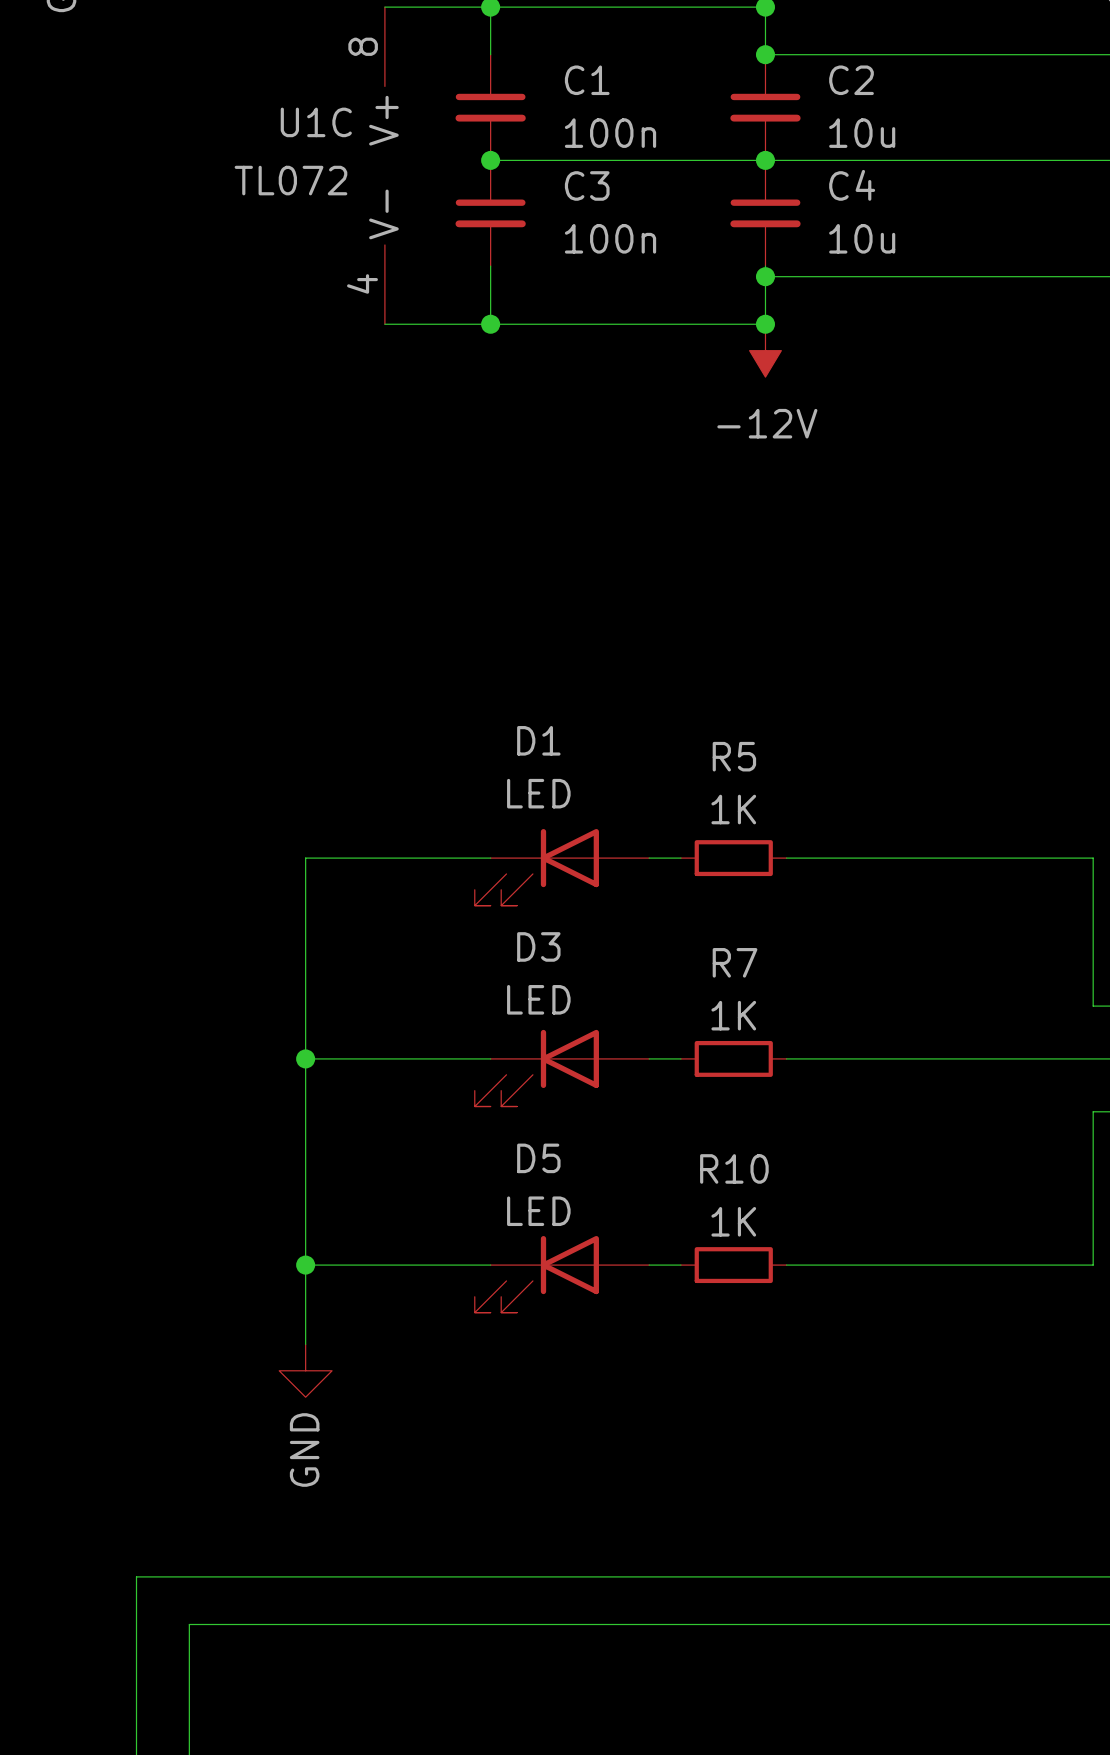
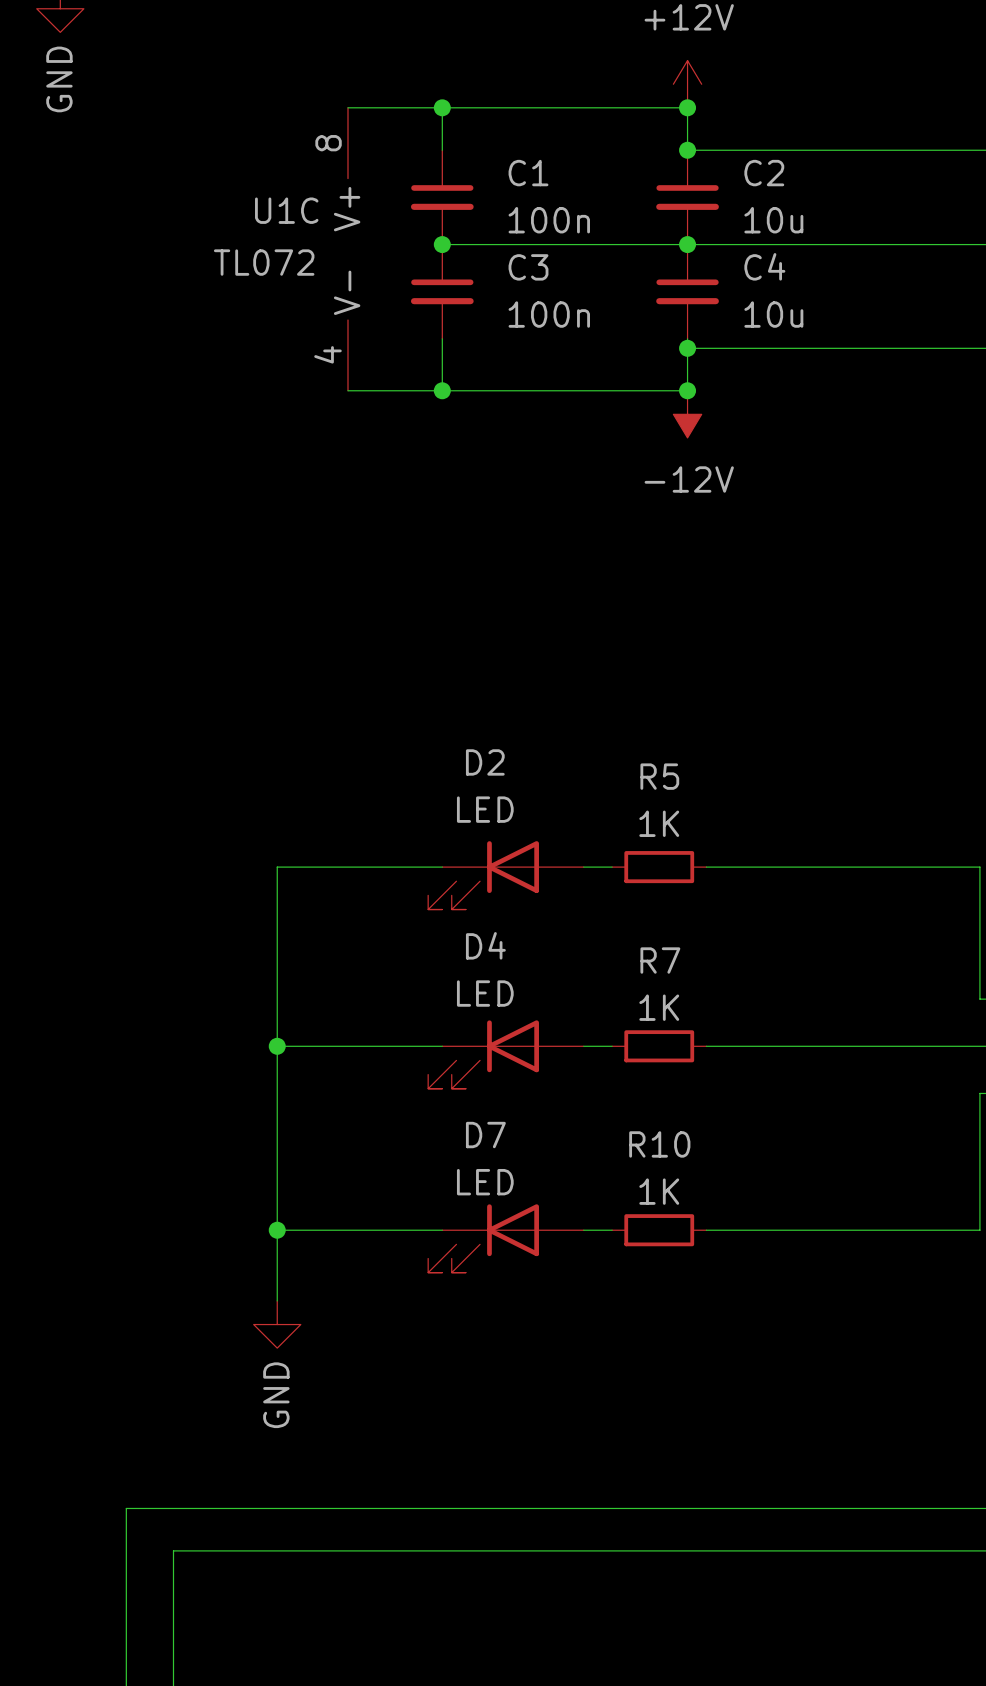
D1 name: D1 (538, 740) -> D2 (485, 762)
D3 name: D3 (538, 946) -> D4 (485, 945)
D5 name: D5 (538, 1158) -> D7 (485, 1135)

